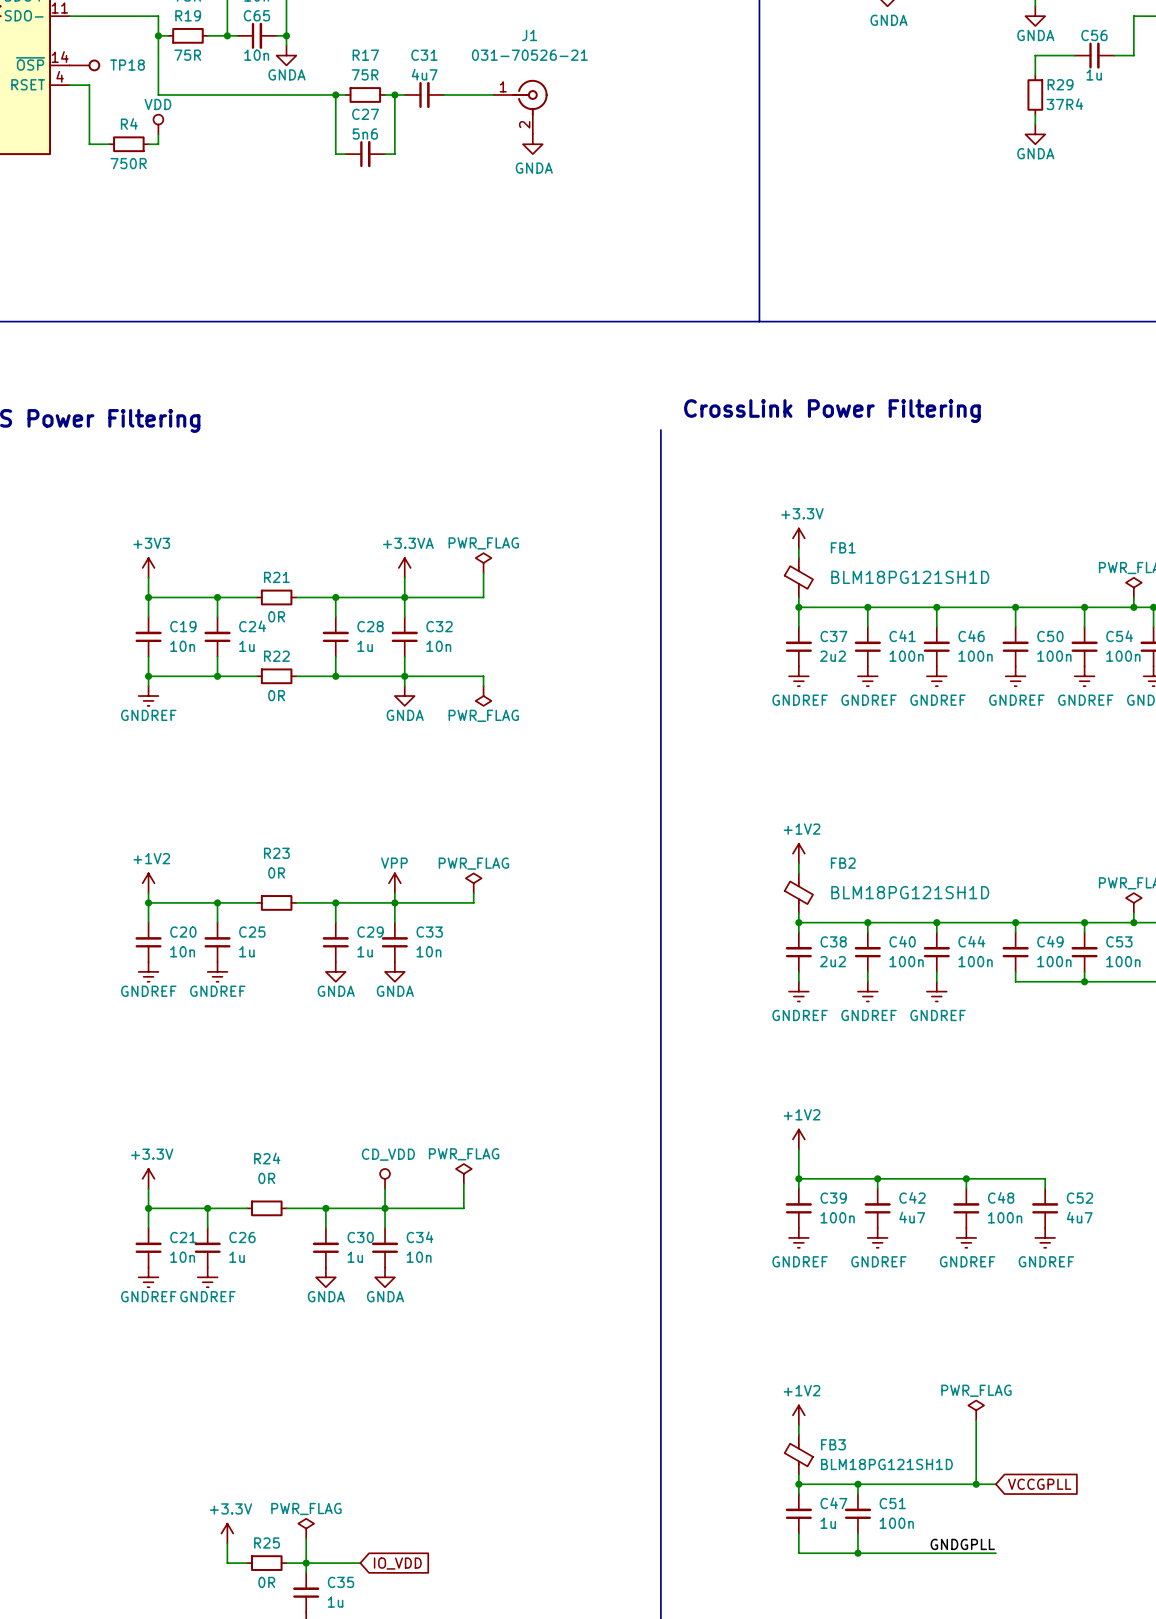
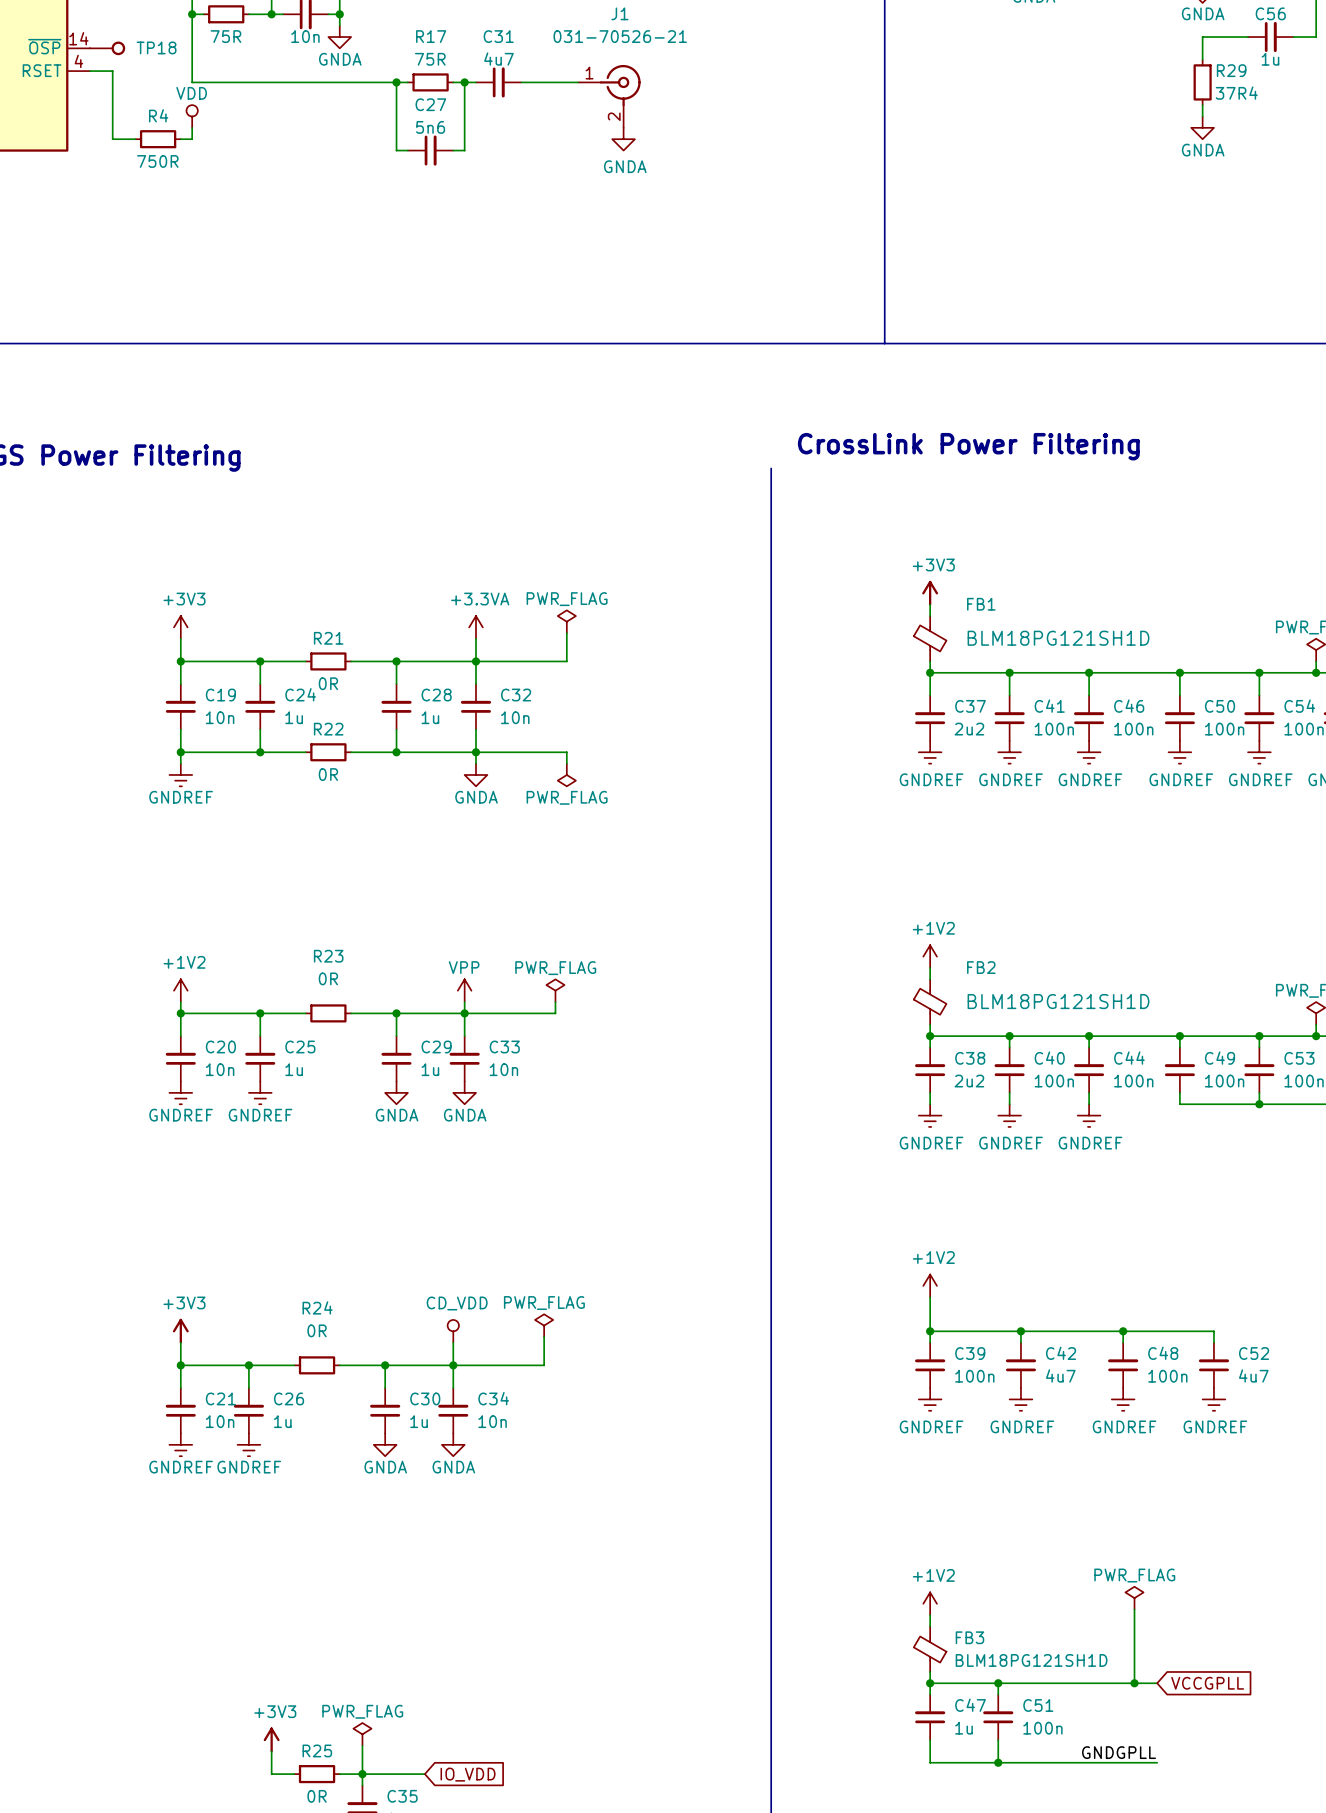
power symbol: +3.3V (798, 538) -> +3V3 (930, 593)
power symbol: +3.3V (148, 1178) -> +3V3 (180, 1331)
power symbol: +3.3V (227, 1533) -> +3V3 (271, 1740)

